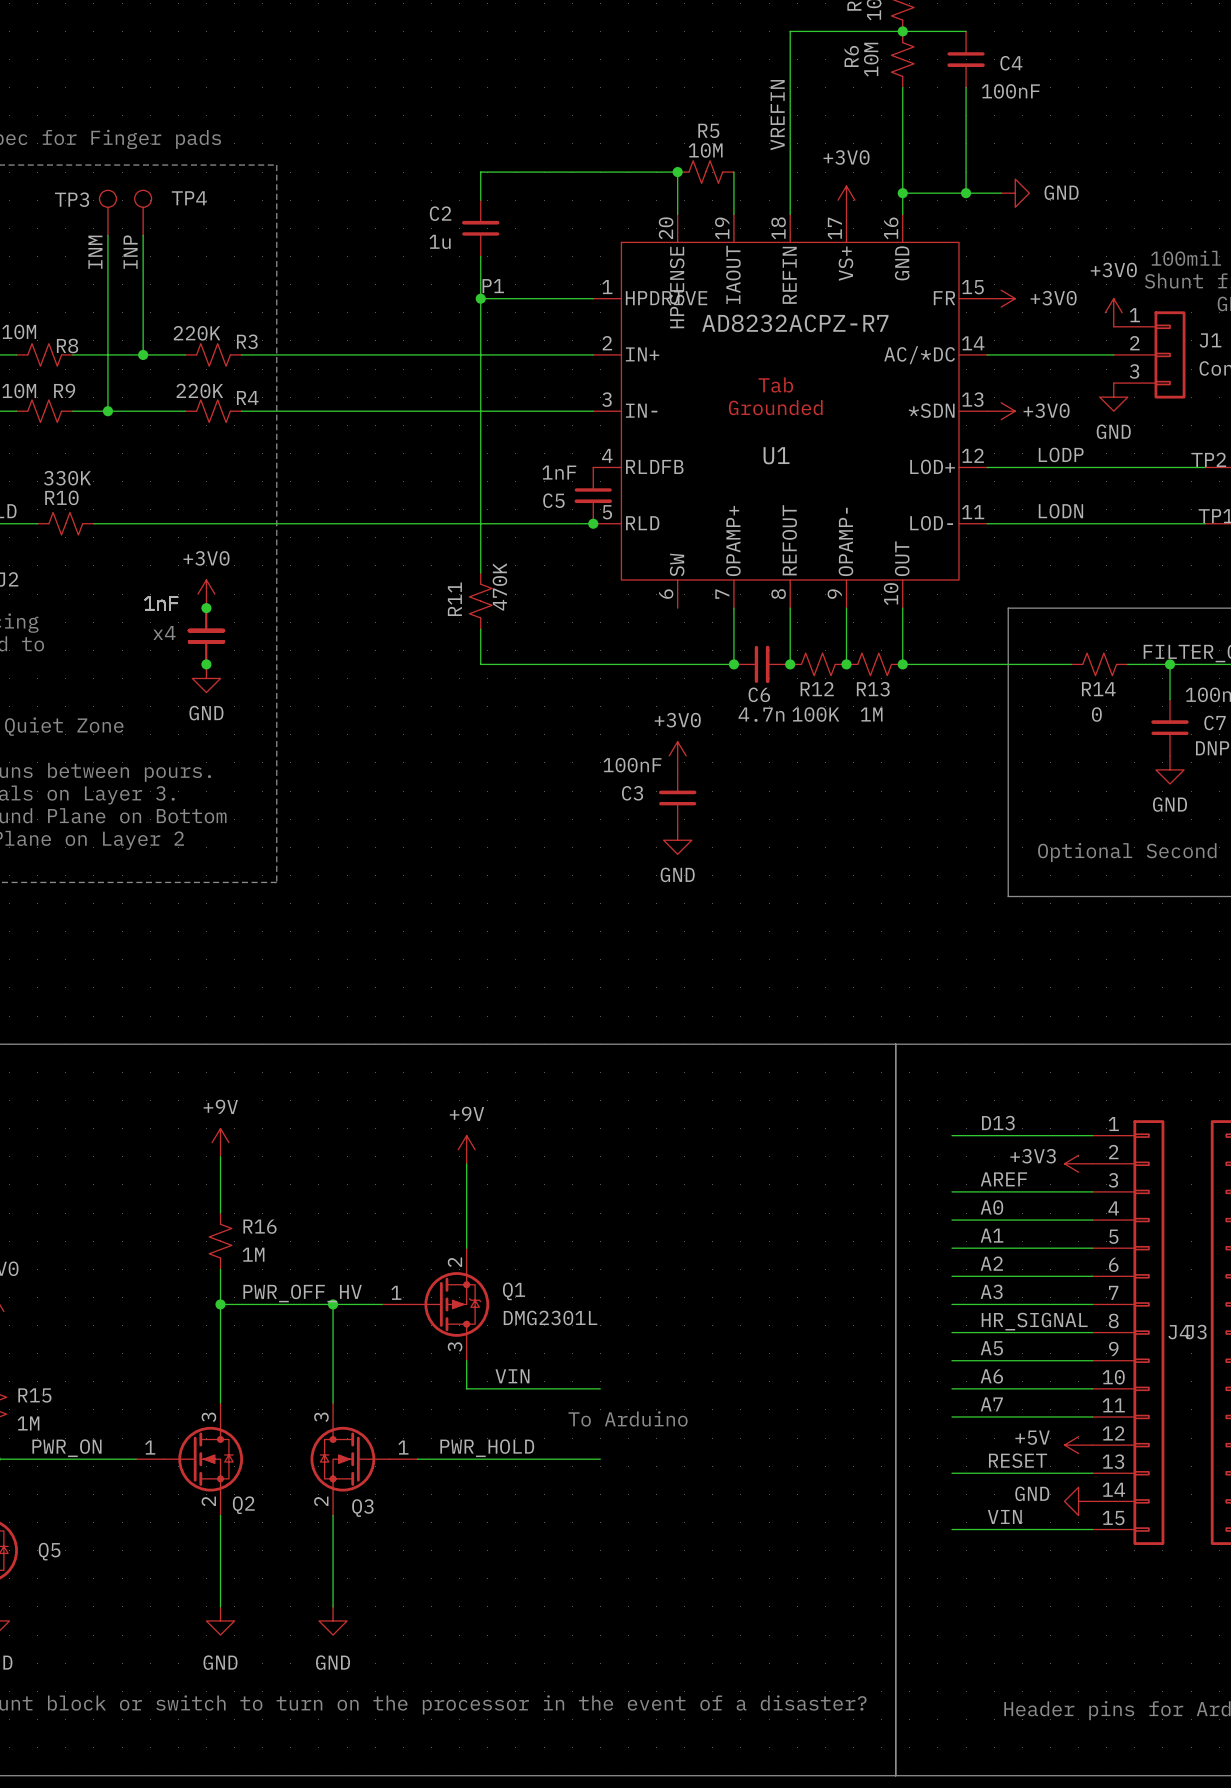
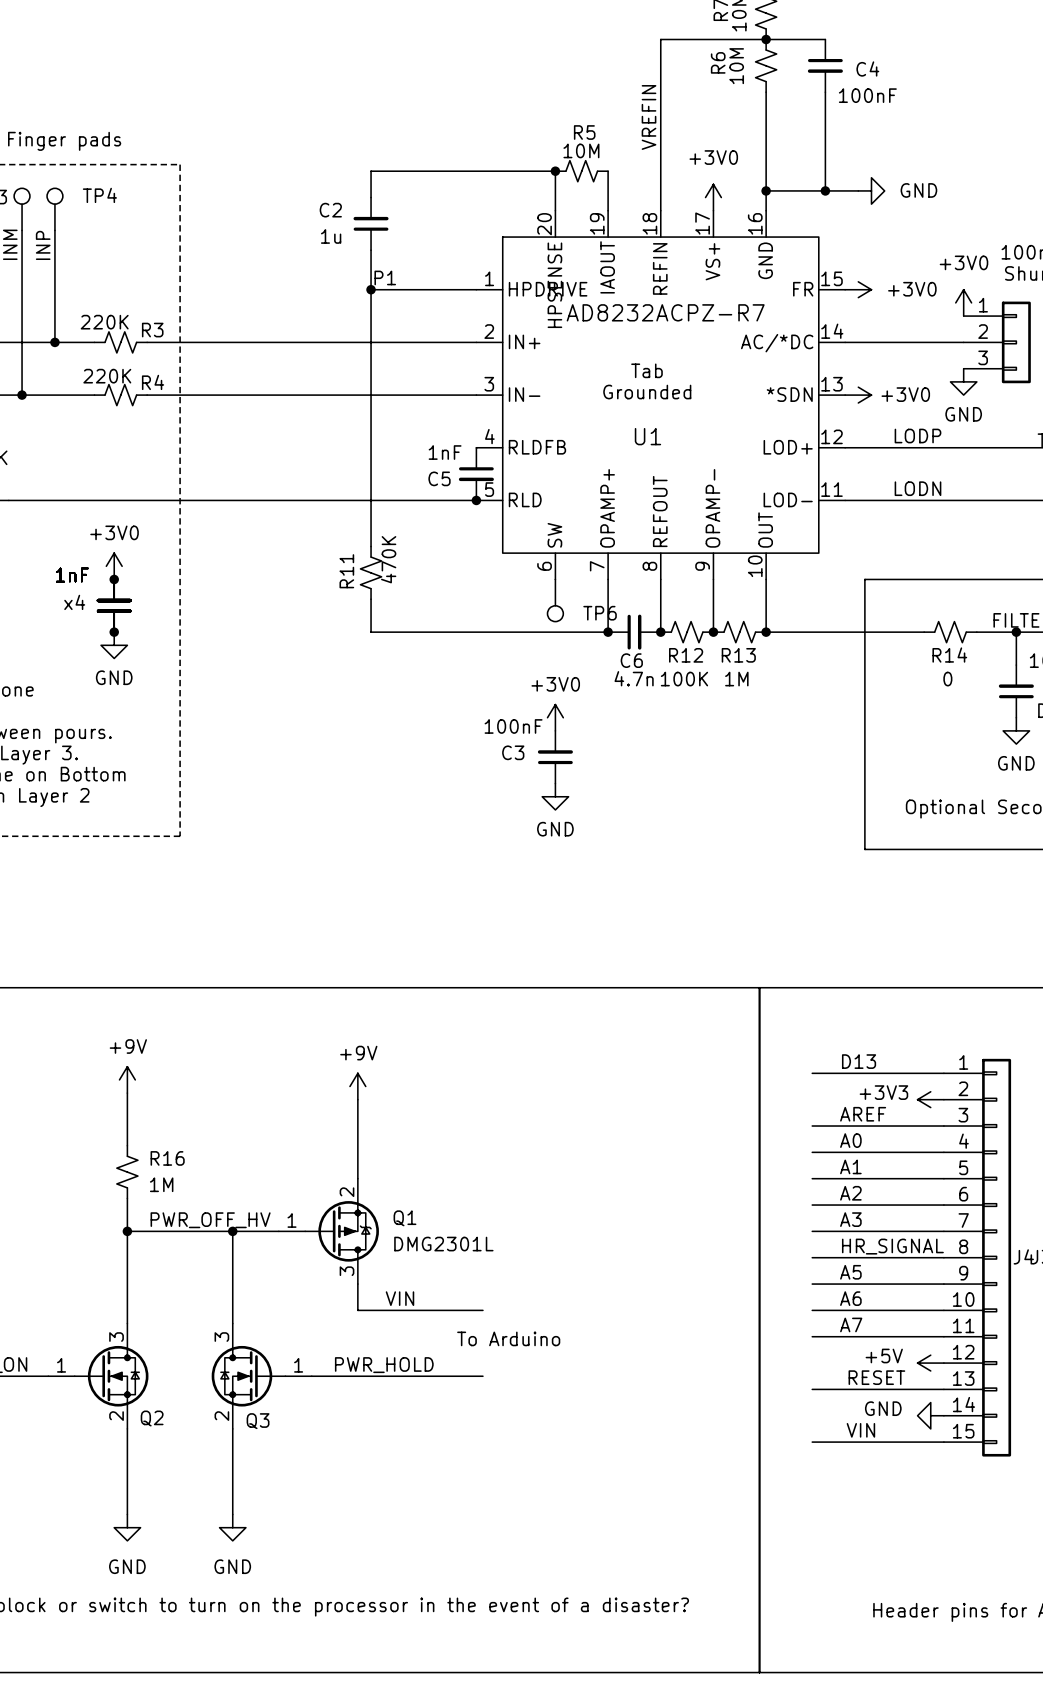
TP6: none -> (555, 600)

